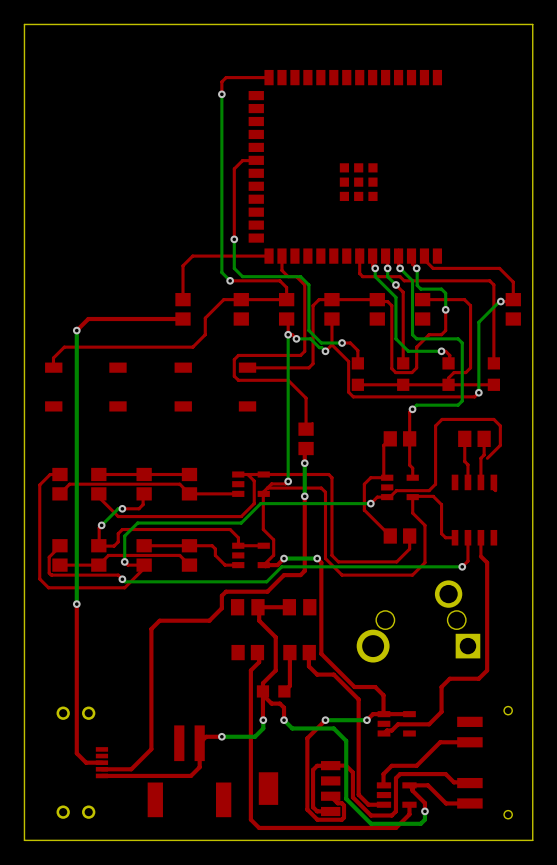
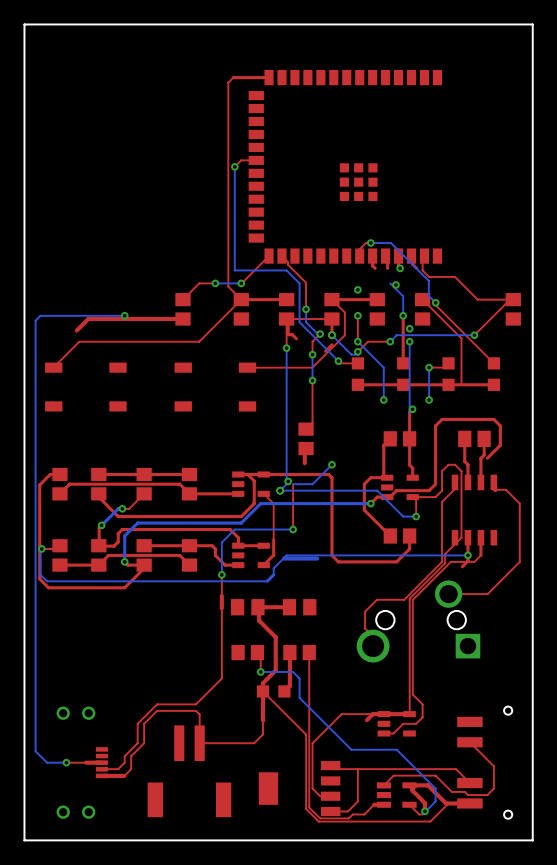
top track: (233, 77) (226, 77) (221, 81) (221, 94) -> none
bottom track: (221, 94) (221, 272) (230, 280) -> none
via: (221, 94) -> none
top track: (256, 160) (242, 160) (234, 168) (234, 239) -> (256, 160) (241, 160) (234, 166)
bottom track: none -> (234, 166) (234, 270) (286, 270) (299, 283) (299, 322) (338, 361)
via: none -> (234, 166)
bottom track: (234, 239) (234, 268) (242, 276) (300, 276) (308, 284) (308, 330) (321, 343) (342, 343) -> none
via: (234, 239) -> none
top track: none -> (370, 243) (365, 243) (359, 249)
bottom track: none -> (370, 243) (390, 243) (428, 280) (428, 295) (435, 302)
via: none -> (370, 243)
top track: (269, 256) (192, 256) (183, 265) (183, 299) -> (215, 283) (199, 283) (183, 299)
top track: none -> (269, 256) (241, 283)
top track: (281, 256) (281, 270) (288, 276) (296, 276) (304, 284) (304, 351) (300, 355) (238, 355) (234, 359) (234, 376) (238, 380) (288, 380) (306, 398) (306, 429) -> (281, 256) (306, 282) (306, 309)
top track: (359, 256) (359, 273) (362, 276) (400, 276) (404, 280) (489, 280) (493, 284) (493, 363) -> (435, 302) (435, 305) (493, 363)
top track: (424, 256) (424, 259) (433, 268) (499, 268) (513, 282) (513, 299) (511, 301) (500, 301) -> none
top track: none -> (422, 257) (422, 270) (429, 276) (455, 276) (477, 299) (510, 299) (474, 335)
bottom track: (375, 268) (375, 276) (395, 297) (395, 338) (408, 351) (441, 351) -> none
via: (375, 268) -> none
bottom track: (387, 268) (387, 276) (395, 284) -> none
via: (387, 268) -> none
bottom track: (400, 268) (412, 280) (412, 334) (416, 338) (458, 338) (462, 343) (462, 401) (458, 405) (416, 405) (412, 409) -> none
bottom track: (416, 268) (417, 285) (420, 289) (441, 289) (445, 293) (445, 309) -> none
via: (416, 268) -> none
top track: (230, 280) (279, 280) (286, 287) (286, 299) -> none
via: (230, 280) -> none
via: none -> (215, 283)
bottom track: none -> (241, 283) (215, 283)
via: none -> (241, 283)
bottom track: none -> (390, 283) (403, 296) (403, 315)
top track: (395, 284) (403, 292) (403, 315) -> none
via: none -> (357, 289)
top track: (241, 299) (223, 299) (205, 318) (205, 334) (192, 347) (64, 347) (53, 358) (53, 367) -> (233, 77) (228, 82) (228, 286) (241, 299) (199, 341) (79, 341) (53, 367)
top track: (331, 299) (319, 299) (313, 305) (313, 363) (308, 367) (247, 367) -> (331, 299) (344, 312) (344, 335) (312, 367) (247, 367)
top track: (377, 299) (379, 301) (387, 301) (391, 305) (391, 368) (395, 372) (411, 372) (416, 367) (416, 347) (429, 334) (441, 334) (445, 330) (445, 309) -> none
top track: (422, 299) (464, 299) (470, 305) (470, 367) (465, 372) (453, 372) (448, 378) (448, 384) -> (422, 299) (461, 338) (461, 384)
bottom track: (500, 301) (478, 322) (478, 392) -> none
via: (500, 301) -> none
bottom track: none -> (306, 309) (306, 322) (319, 335) (320, 334)
via: none -> (306, 309)
via position: (445, 309) -> (435, 302)
bottom track: none -> (124, 315) (40, 315) (35, 320) (35, 751) (47, 762) (66, 762)
top track: none -> (357, 315) (357, 341)
via: none -> (357, 315)
via: none -> (403, 315)
top track: none -> (331, 319) (286, 319) (286, 348)
via: none -> (409, 328)
bottom track: (76, 330) (76, 604) -> none
via position: (76, 330) -> (124, 315)
bottom track: (288, 334) (288, 481) -> none
via: (288, 334) -> none
top track: none -> (320, 334) (312, 341) (312, 354)
via: none -> (320, 334)
top track: (331, 335) (331, 344) (348, 361) (348, 392) (353, 396) (474, 396) (478, 392) -> none
bottom track: none -> (331, 335) (351, 354) (357, 354) (357, 351)
via: none -> (331, 335)
bottom track: none -> (474, 335) (396, 335) (390, 341)
via: none -> (474, 335)
bottom track: (296, 338) (310, 338) (325, 351) -> none
via: (296, 338) -> none
bottom track: none -> (357, 341) (383, 367) (383, 399)
via: none -> (357, 341)
top track: none -> (390, 341) (368, 341) (357, 351)
via: none -> (390, 341)
bottom track: none -> (409, 341) (409, 412)
via: none -> (409, 341)
top track: (342, 343) (350, 343) (357, 350) (357, 363) -> (338, 361) (340, 363) (357, 363)
via: (342, 343) -> none
bottom track: none -> (286, 348) (286, 484) (280, 490) (377, 490) (403, 516) (416, 516)
via: none -> (286, 348)
via: (325, 351) -> none
via: none -> (357, 351)
top track: (441, 351) (445, 351) (449, 355) (448, 363) -> none
via: (441, 351) -> none
bottom track: none -> (312, 354) (312, 380)
via: none -> (312, 354)
via: none -> (338, 361)
bottom track: none -> (429, 367) (429, 399)
via: none -> (429, 367)
top track: none -> (444, 367) (429, 367)
top track: none -> (312, 380) (312, 422)
via: none -> (312, 380)
via: (478, 392) -> none
via: none -> (383, 399)
via: none -> (429, 399)
bottom track: (304, 463) (304, 496) -> none
via: (304, 463) -> none
bottom track: none -> (331, 464) (312, 484) (293, 484)
via: none -> (331, 464)
top track: (288, 481) (285, 483) (271, 483) (263, 491) (263, 529) (273, 539) -> (264, 494) (273, 503) (273, 539)
top track: none -> (293, 484) (293, 529)
top track: (267, 488) (321, 488) (325, 492) (325, 558) (342, 575) (412, 575) (424, 562) (424, 525) (412, 513) (413, 496) (433, 496) (441, 504) (441, 533) (445, 537) (455, 537) -> none
top track: none -> (455, 488) (442, 501) (442, 561) (404, 599) (376, 599) (365, 611) (365, 628) (373, 636) (373, 646)
top track: none -> (493, 488) (505, 489) (519, 503) (519, 561) (487, 594) (448, 594)
via: none -> (280, 490)
top track: (143, 494) (143, 504) (138, 508) (122, 508) -> none
top track: none -> (141, 496) (129, 508) (119, 508)
top track: (304, 496) (304, 570) (300, 575) (284, 575) (267, 591) (226, 591) (221, 595) -> (221, 574) (221, 595)
via: (304, 496) -> none
top track: none -> (416, 516) (416, 497) (435, 497) (442, 490) (442, 471) (448, 464) (455, 464) (461, 471) (461, 537) (445, 554) (445, 563) (409, 598) (409, 713)
via: none -> (416, 516)
bottom track: none -> (293, 529) (234, 529) (221, 542) (221, 574)
via: none -> (293, 529)
top track: (59, 545) (49, 557) (49, 573) (51, 574) (118, 575) (122, 579) -> none
via: none -> (41, 548)
top track: none -> (56, 548) (41, 548)
top track: (480, 555) (487, 562) (487, 670) (478, 678) (449, 678) (441, 687) (441, 711) (429, 724) (398, 724) (391, 730) (386, 730) (383, 733) -> (480, 555) (474, 561) (450, 561) (412, 599) (412, 694) (422, 704) (422, 717) (416, 723) (403, 723) (393, 733) (383, 733)
top track: (284, 558) (277, 565) (263, 565) (265, 566) -> none
via: (284, 558) -> none
top track: (317, 558) (321, 562) (321, 653) (354, 687) (375, 687) (383, 695) (383, 714) -> none
via: (317, 558) -> none
bottom track: (462, 566) (281, 566) (273, 574) -> (467, 555) (286, 555) (273, 568) (273, 574)
via position: (462, 566) -> (467, 555)
via: none -> (221, 574)
bottom track: (122, 579) (124, 581) (267, 581) -> (41, 548) (40, 574) (47, 581) (267, 581)
via: (122, 579) -> none
top track: (76, 604) (76, 753) (86, 762) -> (66, 762) (86, 762)
via: (76, 604) -> none
top track: (221, 608) (209, 620) (159, 620) (151, 629) (151, 749) (131, 769) (101, 769) -> (221, 608) (221, 678) (195, 704) (157, 704) (137, 723) (137, 743) (124, 756) (124, 762) (118, 769) (102, 769)
top track: (257, 652) (259, 662) (250, 670) (250, 819) (259, 827) (395, 827) (409, 814) (409, 804) -> (422, 814) (419, 814) (409, 804)
top track: (309, 652) (308, 666) (317, 674) (333, 674) (358, 699) (358, 794) (368, 804) (374, 804) -> (309, 652) (309, 807) (320, 818) (348, 818) (352, 814) (364, 814) (374, 804)
top track: none -> (260, 655) (260, 672)
bottom track: none -> (260, 672) (293, 672) (299, 678) (299, 697) (351, 749) (396, 749) (435, 788) (435, 801) (422, 814)
via: none -> (260, 672)
top track: none -> (262, 691) (306, 734) (306, 808) (318, 821) (430, 821) (448, 803)
top track: (263, 691) (263, 695) (271, 703) (279, 703) (284, 707) (284, 720) -> none
bottom track: (263, 720) (263, 728) (255, 736) (221, 736) -> none
via: (263, 720) -> none
bottom track: (284, 720) (292, 728) (333, 728) (346, 740) (346, 798) (371, 823) (420, 823) (424, 819) (424, 811) -> none
via: (284, 720) -> none
top track: (325, 720) (307, 738) (307, 809) (317, 819) (341, 819) (344, 817) (344, 805) (337, 803) (330, 796) -> (373, 714) (341, 714) (312, 743) (312, 788) (320, 796) (330, 796)
via: (325, 720) -> none
bottom track: (366, 720) (325, 720) -> none
via: (366, 720) -> none
top track: (221, 736) (206, 736) (199, 743) (199, 767) (190, 775) (124, 775) -> (262, 719) (262, 734) (254, 743) (199, 743) (199, 714) (195, 710) (157, 710) (144, 723) (144, 743) (131, 756) (131, 769) (124, 775)
via: (221, 736) -> none
top track: (469, 742) (440, 742) (416, 765) (391, 765) (383, 774) (383, 785) -> (469, 742) (493, 766) (493, 788) (487, 795) (467, 795) (464, 791) (451, 791) (435, 775) (393, 775) (383, 785)
via: none -> (66, 762)
top track: none -> (334, 769) (455, 769) (469, 783)
top track: none -> (357, 769) (357, 801) (347, 811) (330, 811)
top track: (462, 782) (453, 782) (445, 774) (400, 774) (395, 778) (395, 811) (391, 815) (371, 815) (352, 797) (352, 772) (346, 765) (317, 765) (313, 769) (313, 807) (317, 811) (325, 811) -> none

